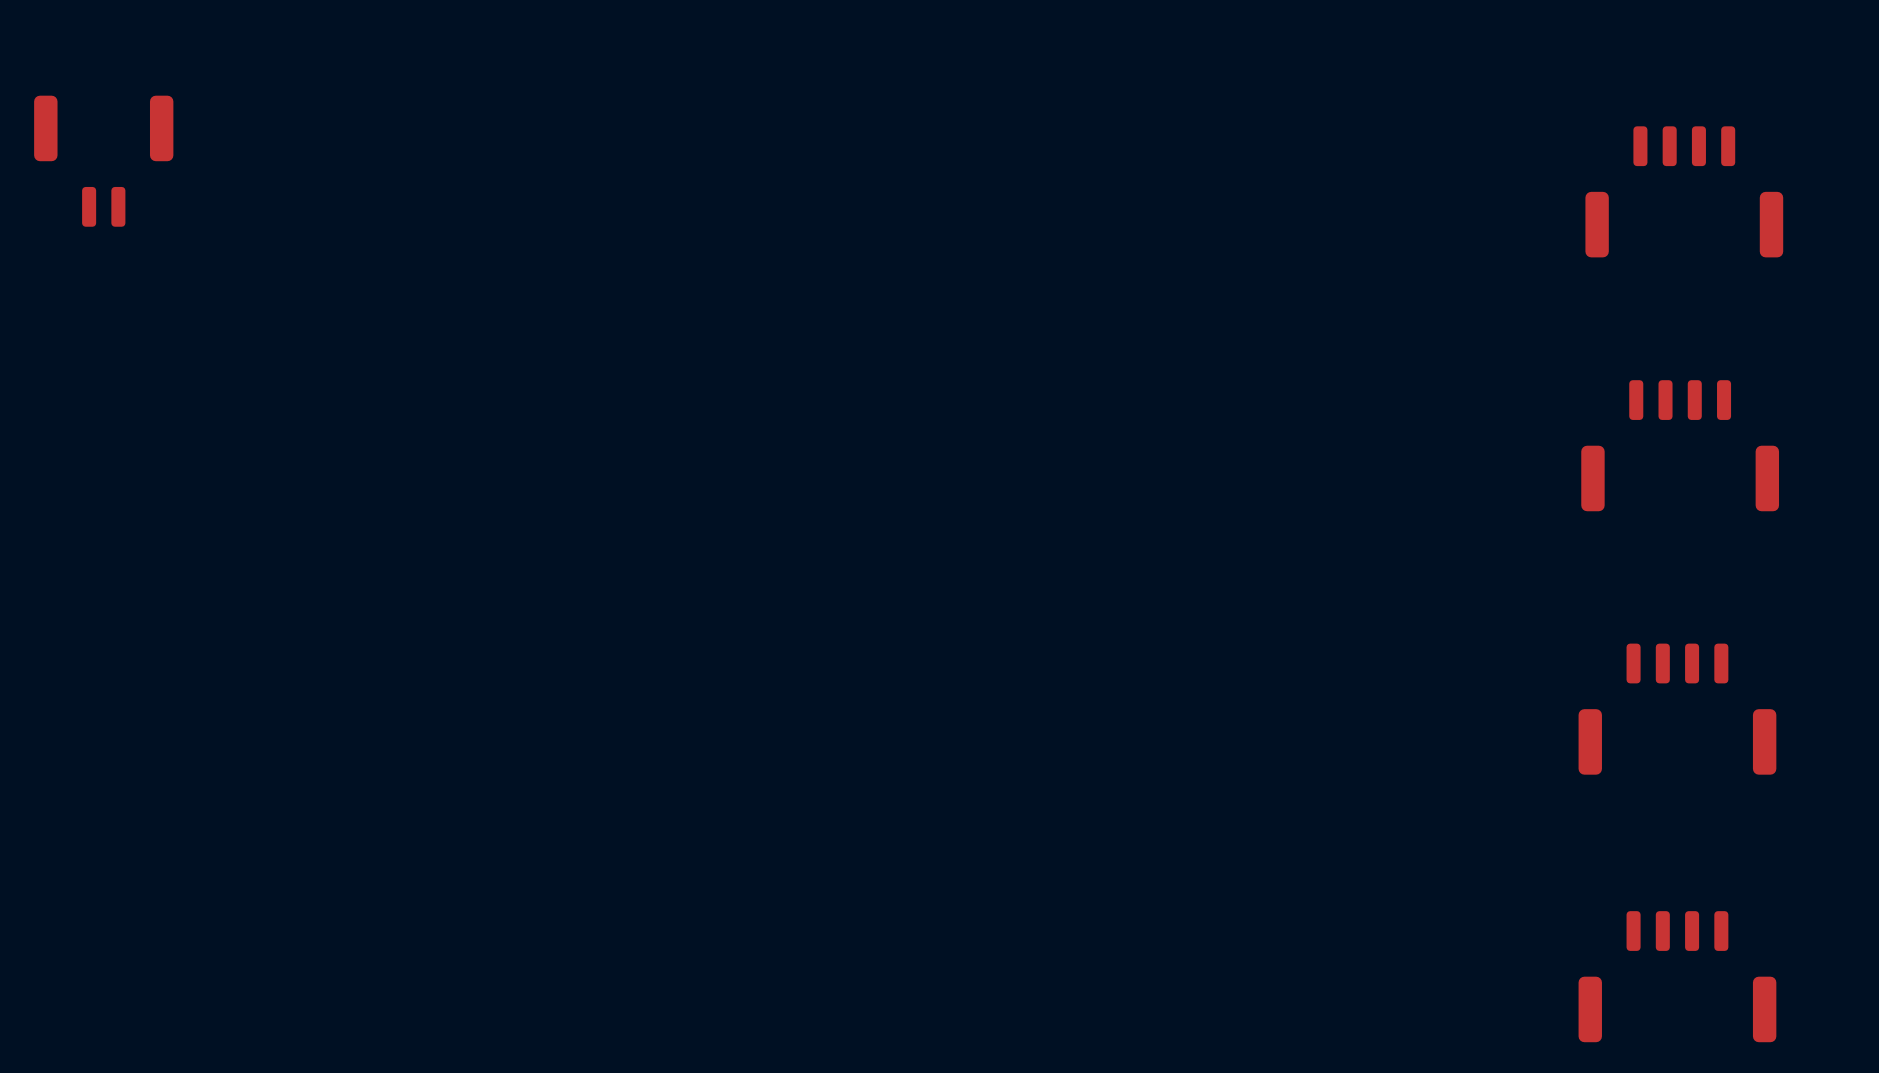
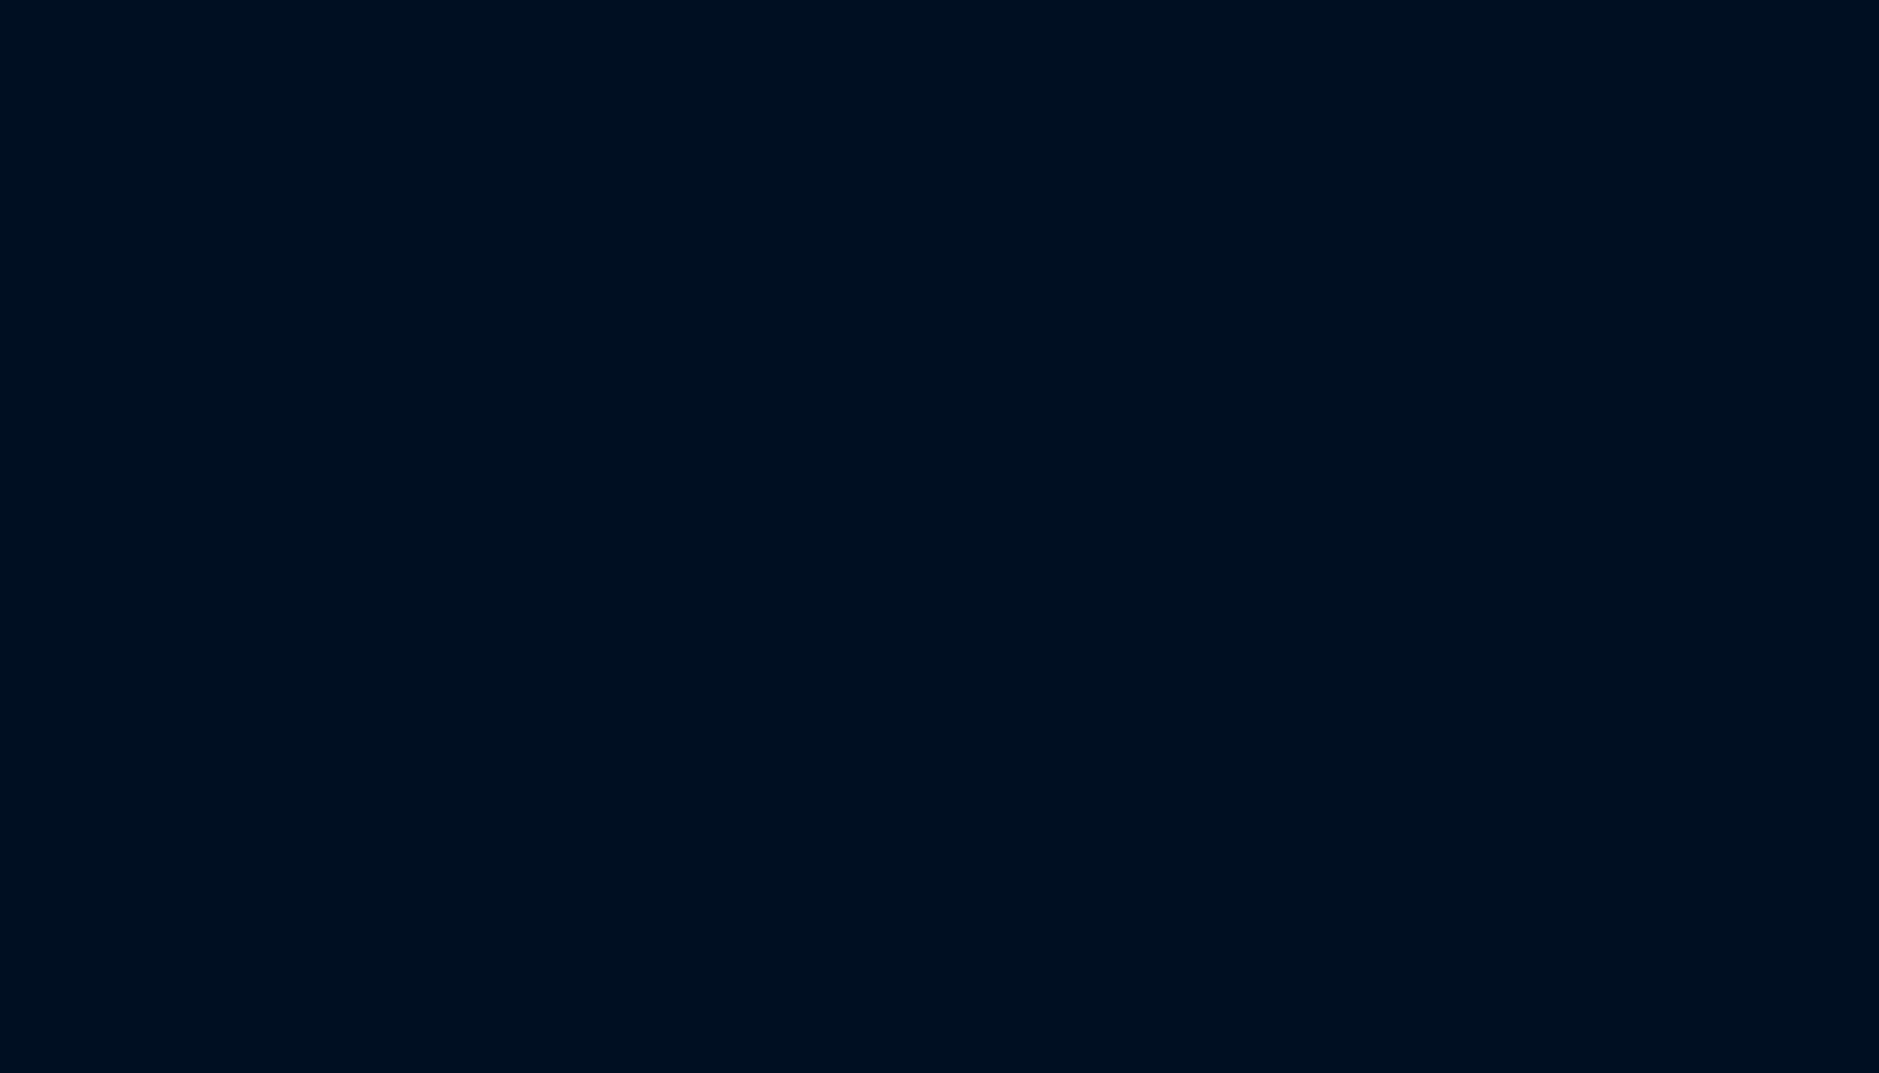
part: (103, 161) -> none
part: (1684, 191) -> none
part: (1680, 445) -> none
part: (1677, 709) -> none
part: (1677, 976) -> none

